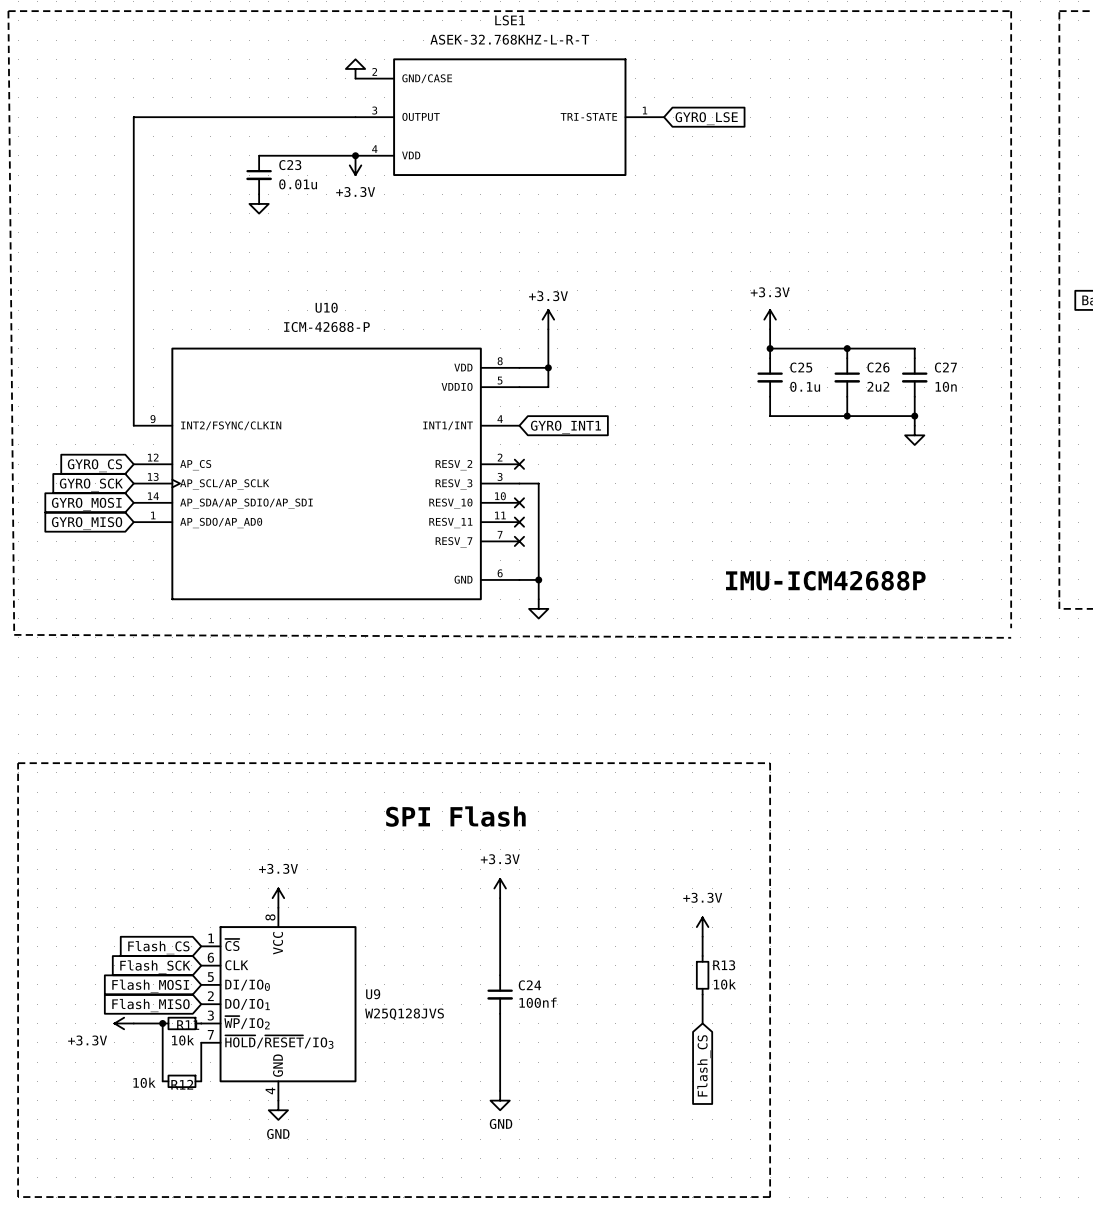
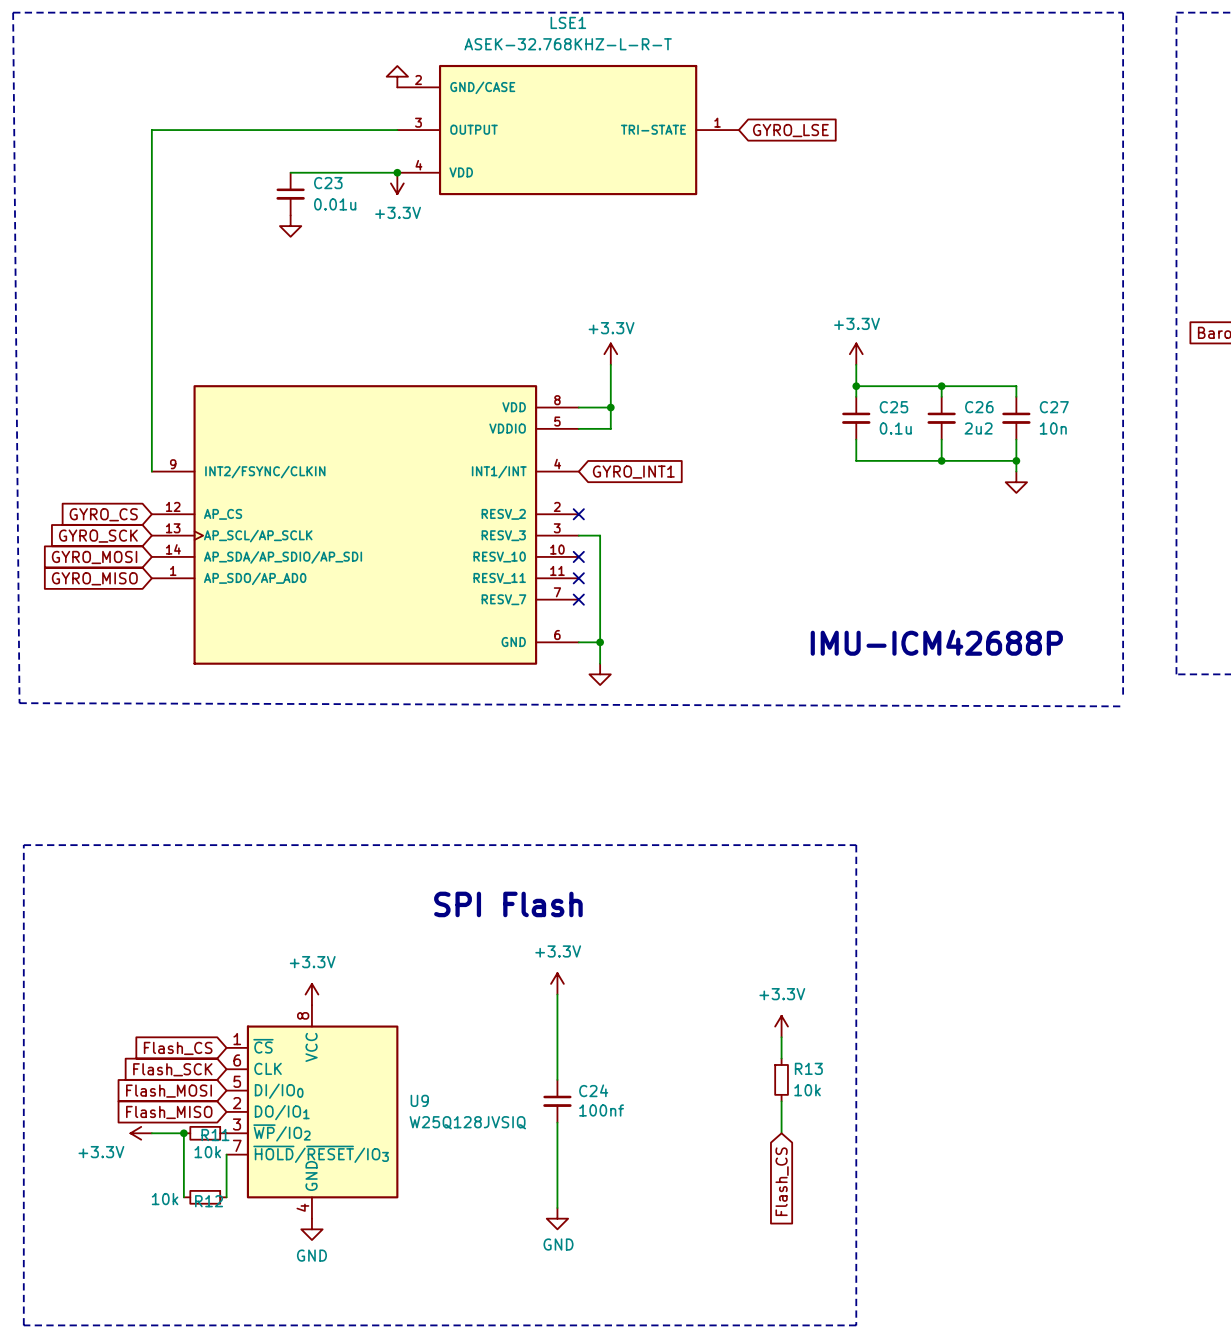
U10 name: U10 (326, 307) -> none
U10 value: ICM-42688-P (326, 327) -> none
U9 value: W25Q128JVS (404, 1014) -> W25Q128JVSIQ (467, 1122)

